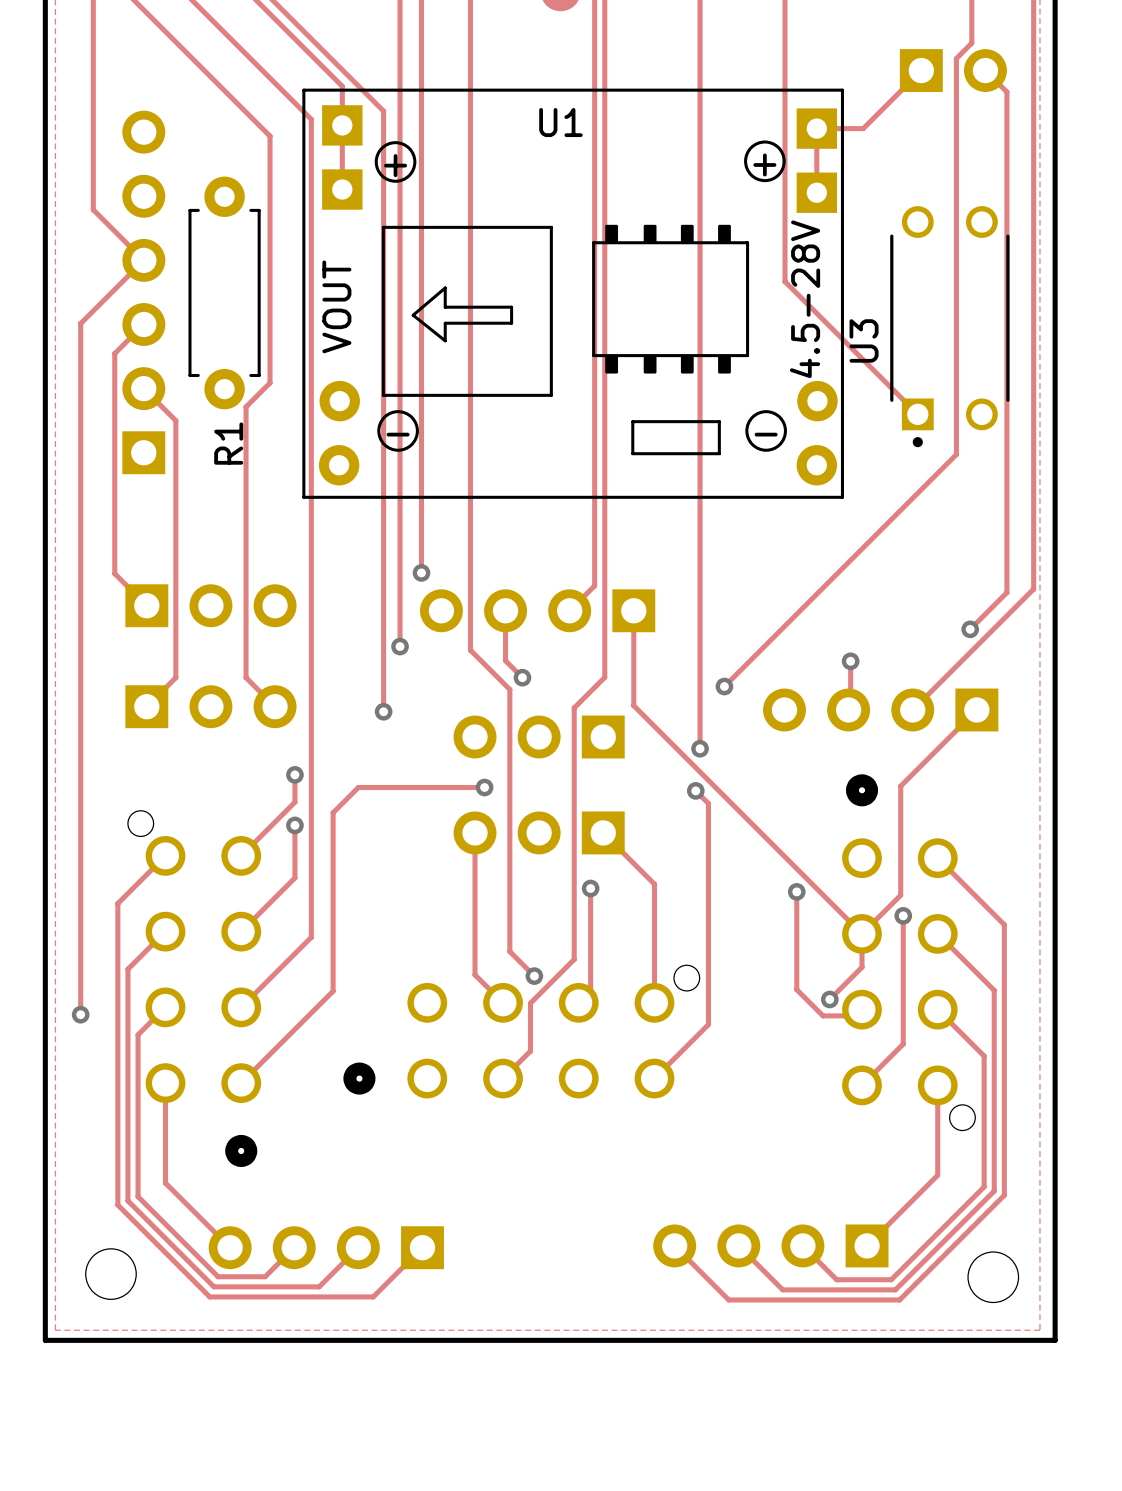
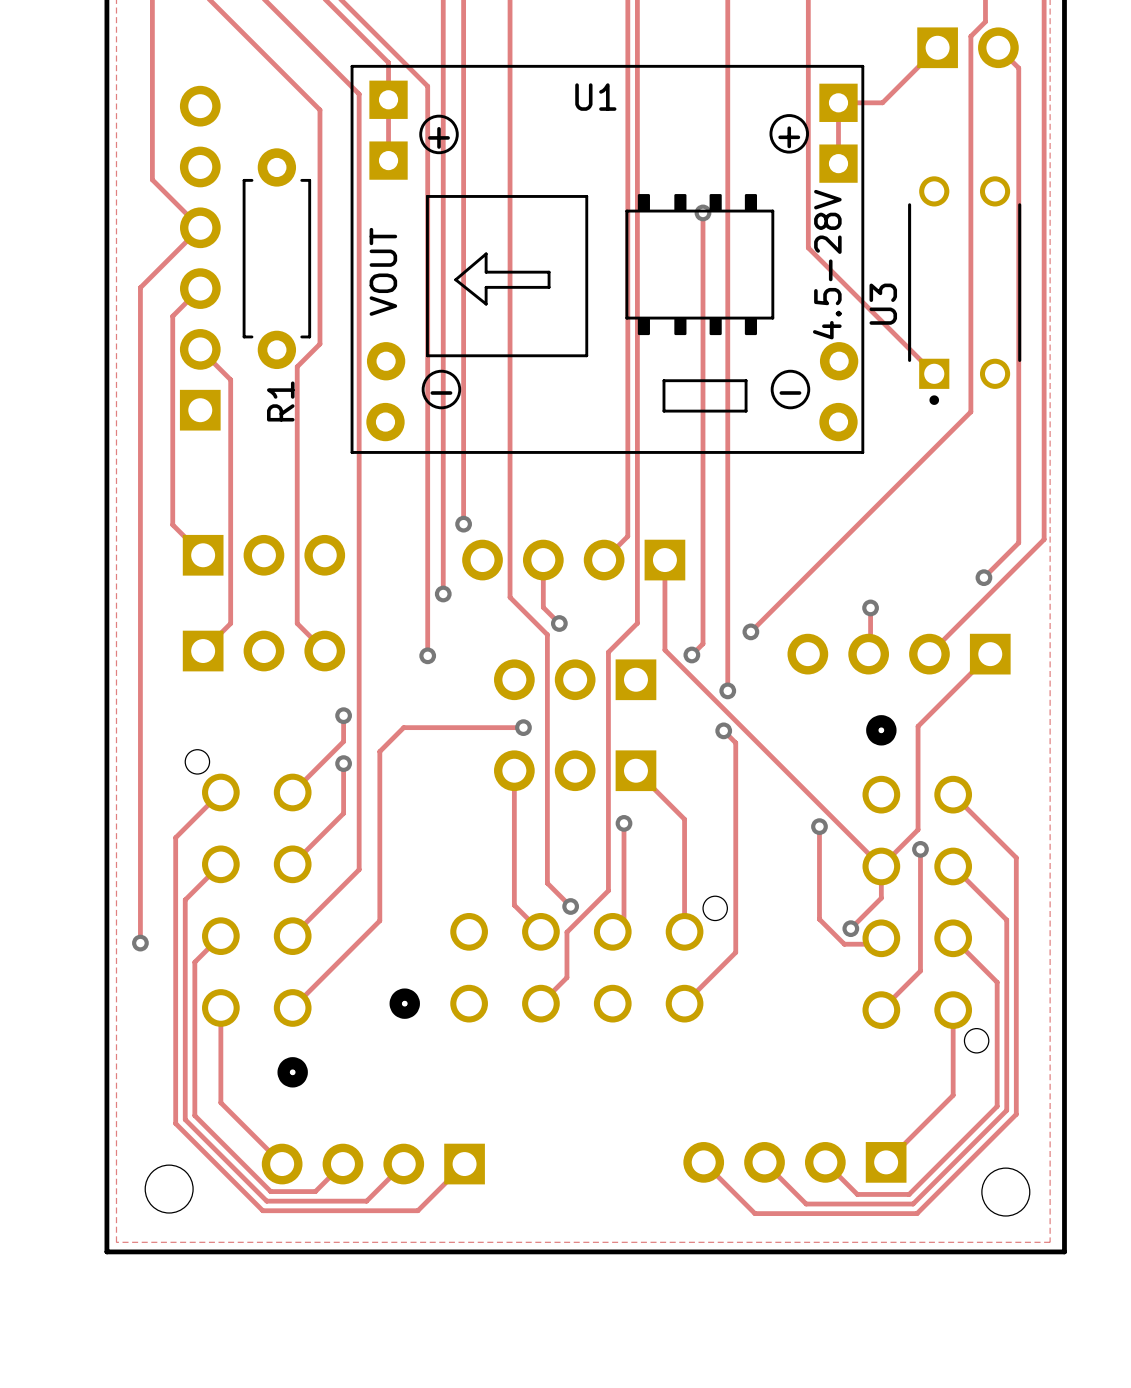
track: none -> (703, 212) (703, 643) (691, 654)
via: none -> (703, 212)
via: none -> (691, 654)

